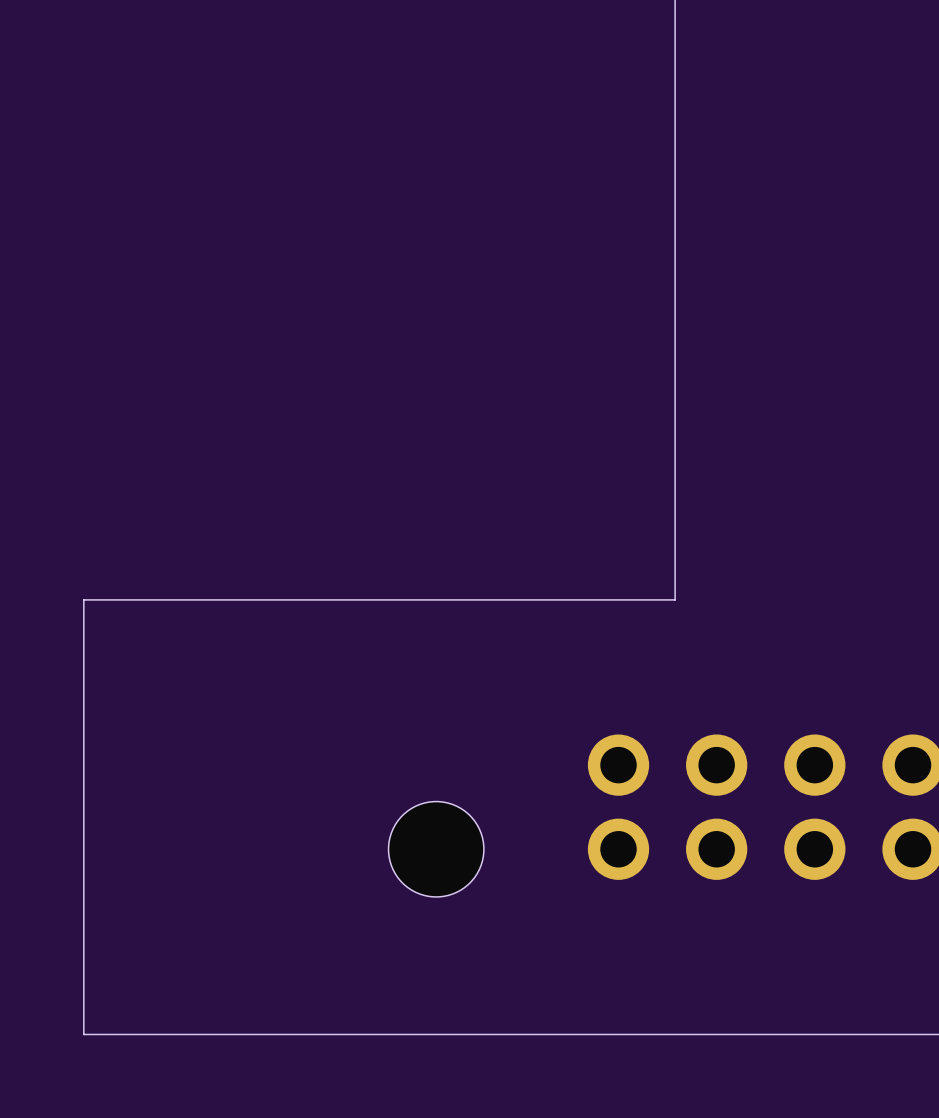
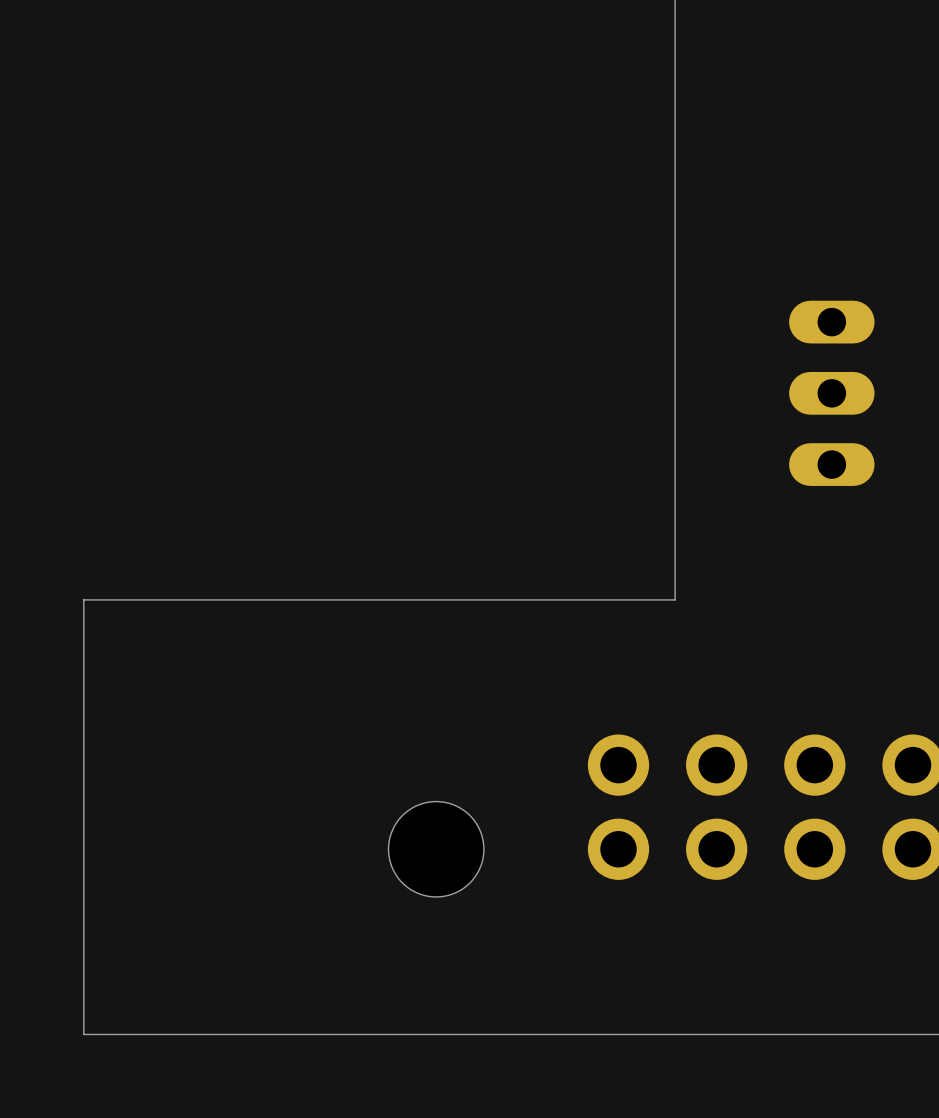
part: none -> (831, 393)

